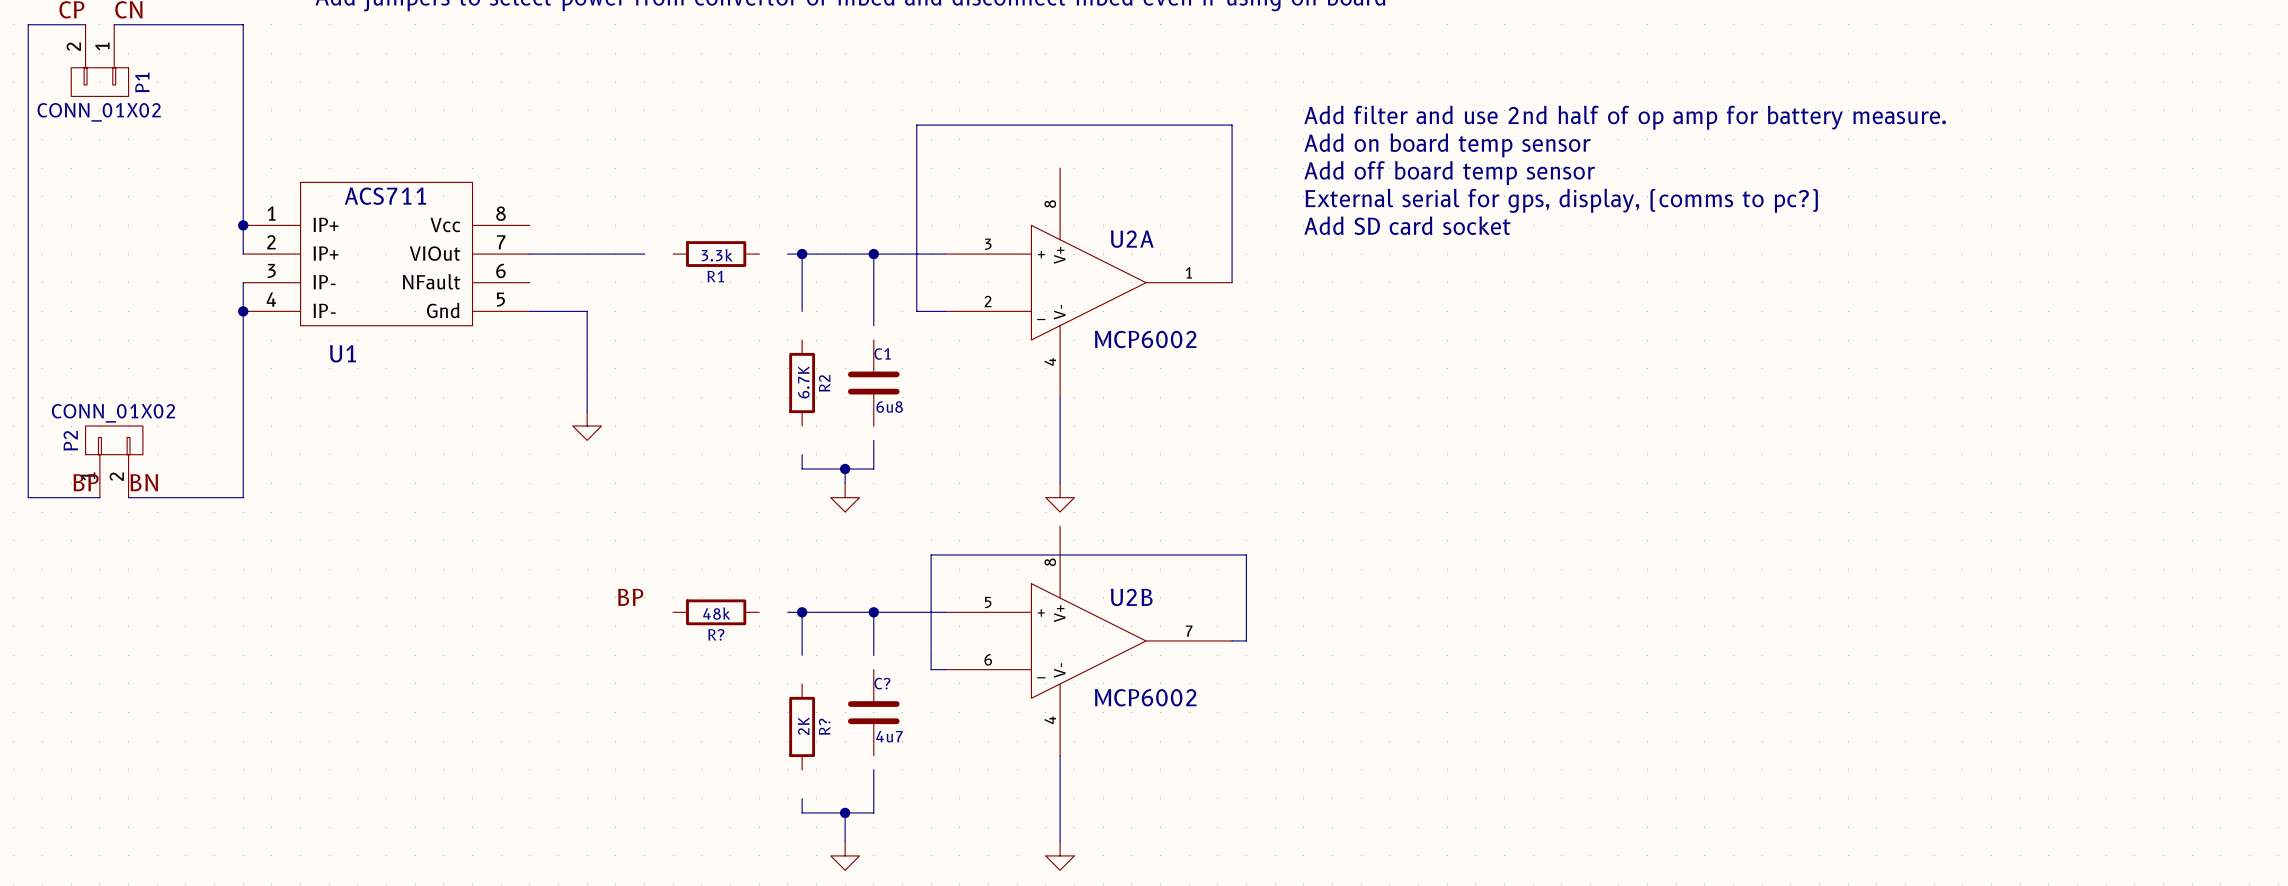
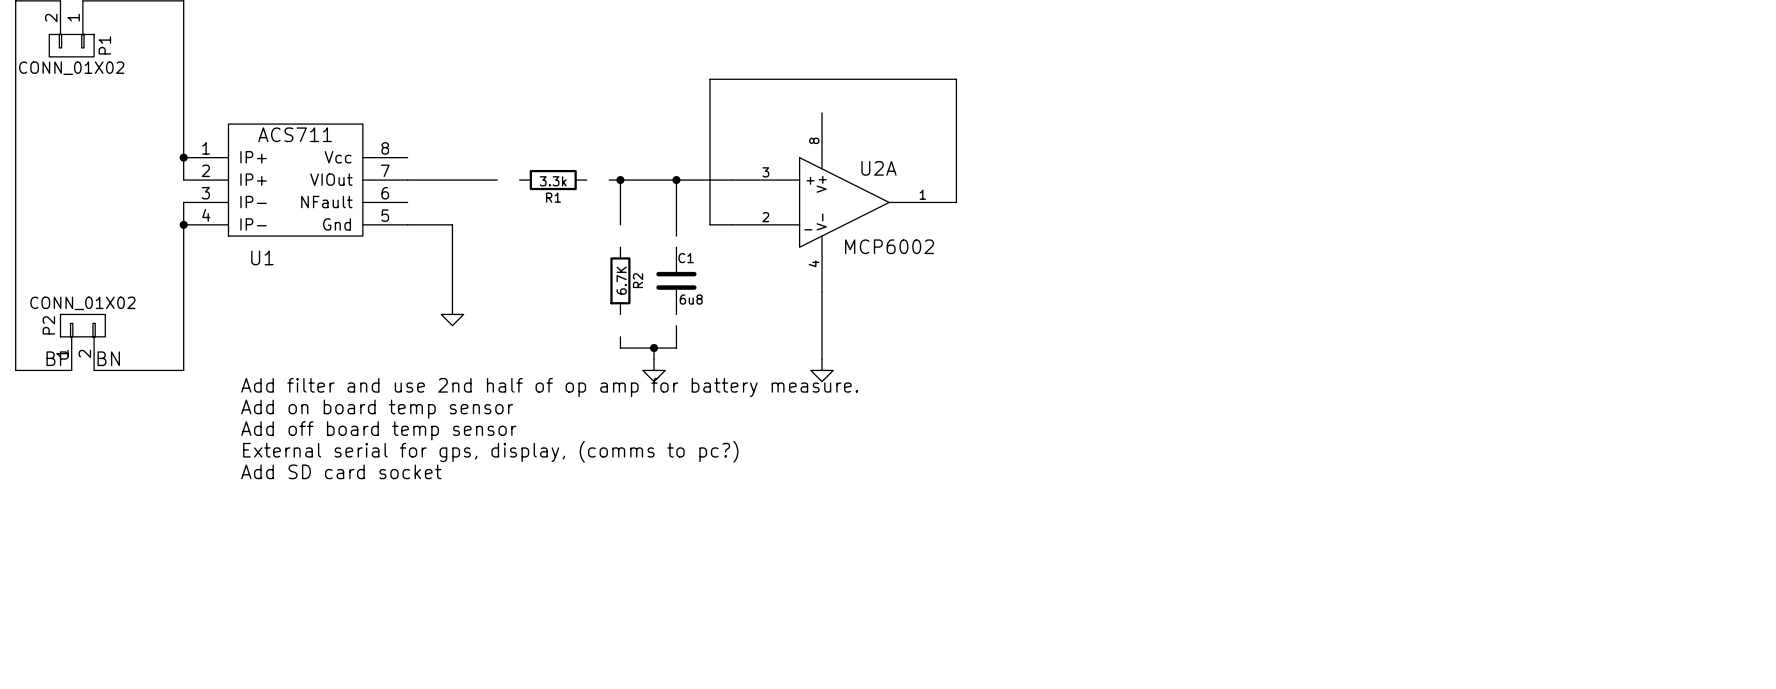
text: Add filter and use 2nd half of op amp for battery measure. (1625, 117) -> none
text: Add on board temp sensor (1447, 145) -> none
text: Add off board temp sensor (1449, 173) -> none
text: External serial for gps, display, (comms to pc?) (1561, 200) -> none
text: Add SD card socket (1407, 225) -> none
text: none -> Add filter and use 2nd half of op amp for battery measure. (549, 387)
text: none -> Add on board temp sensor (377, 409)
text: none -> Add off board temp sensor (378, 430)
label: BP (630, 597) -> none
text: none -> External serial for gps, display, (comms to pc?) (490, 451)
R?: 48k (716, 612) -> none
wire: (787, 612) (945, 612) -> none
wire: (802, 612) (802, 655) -> none
junction: (802, 612) -> none
wire: (873, 612) (873, 655) -> none
junction: (873, 612) -> none
text: none -> Add SD card socket (341, 471)
U2B: MCP6002 (1088, 640) -> none
wire: (1232, 640) (1246, 640) (1246, 554) (931, 554) (931, 669) (945, 669) -> none
C?: 4u7 (873, 712) -> none
R?: 2K (802, 726) -> none
wire: (1060, 755) (1060, 841) -> none
wire: (873, 769) (873, 812) (802, 812) (802, 798) -> none
wire: (845, 812) (845, 841) -> none
junction: (845, 812) -> none
power symbol: (845, 855) -> none
power symbol: (1060, 855) -> none

